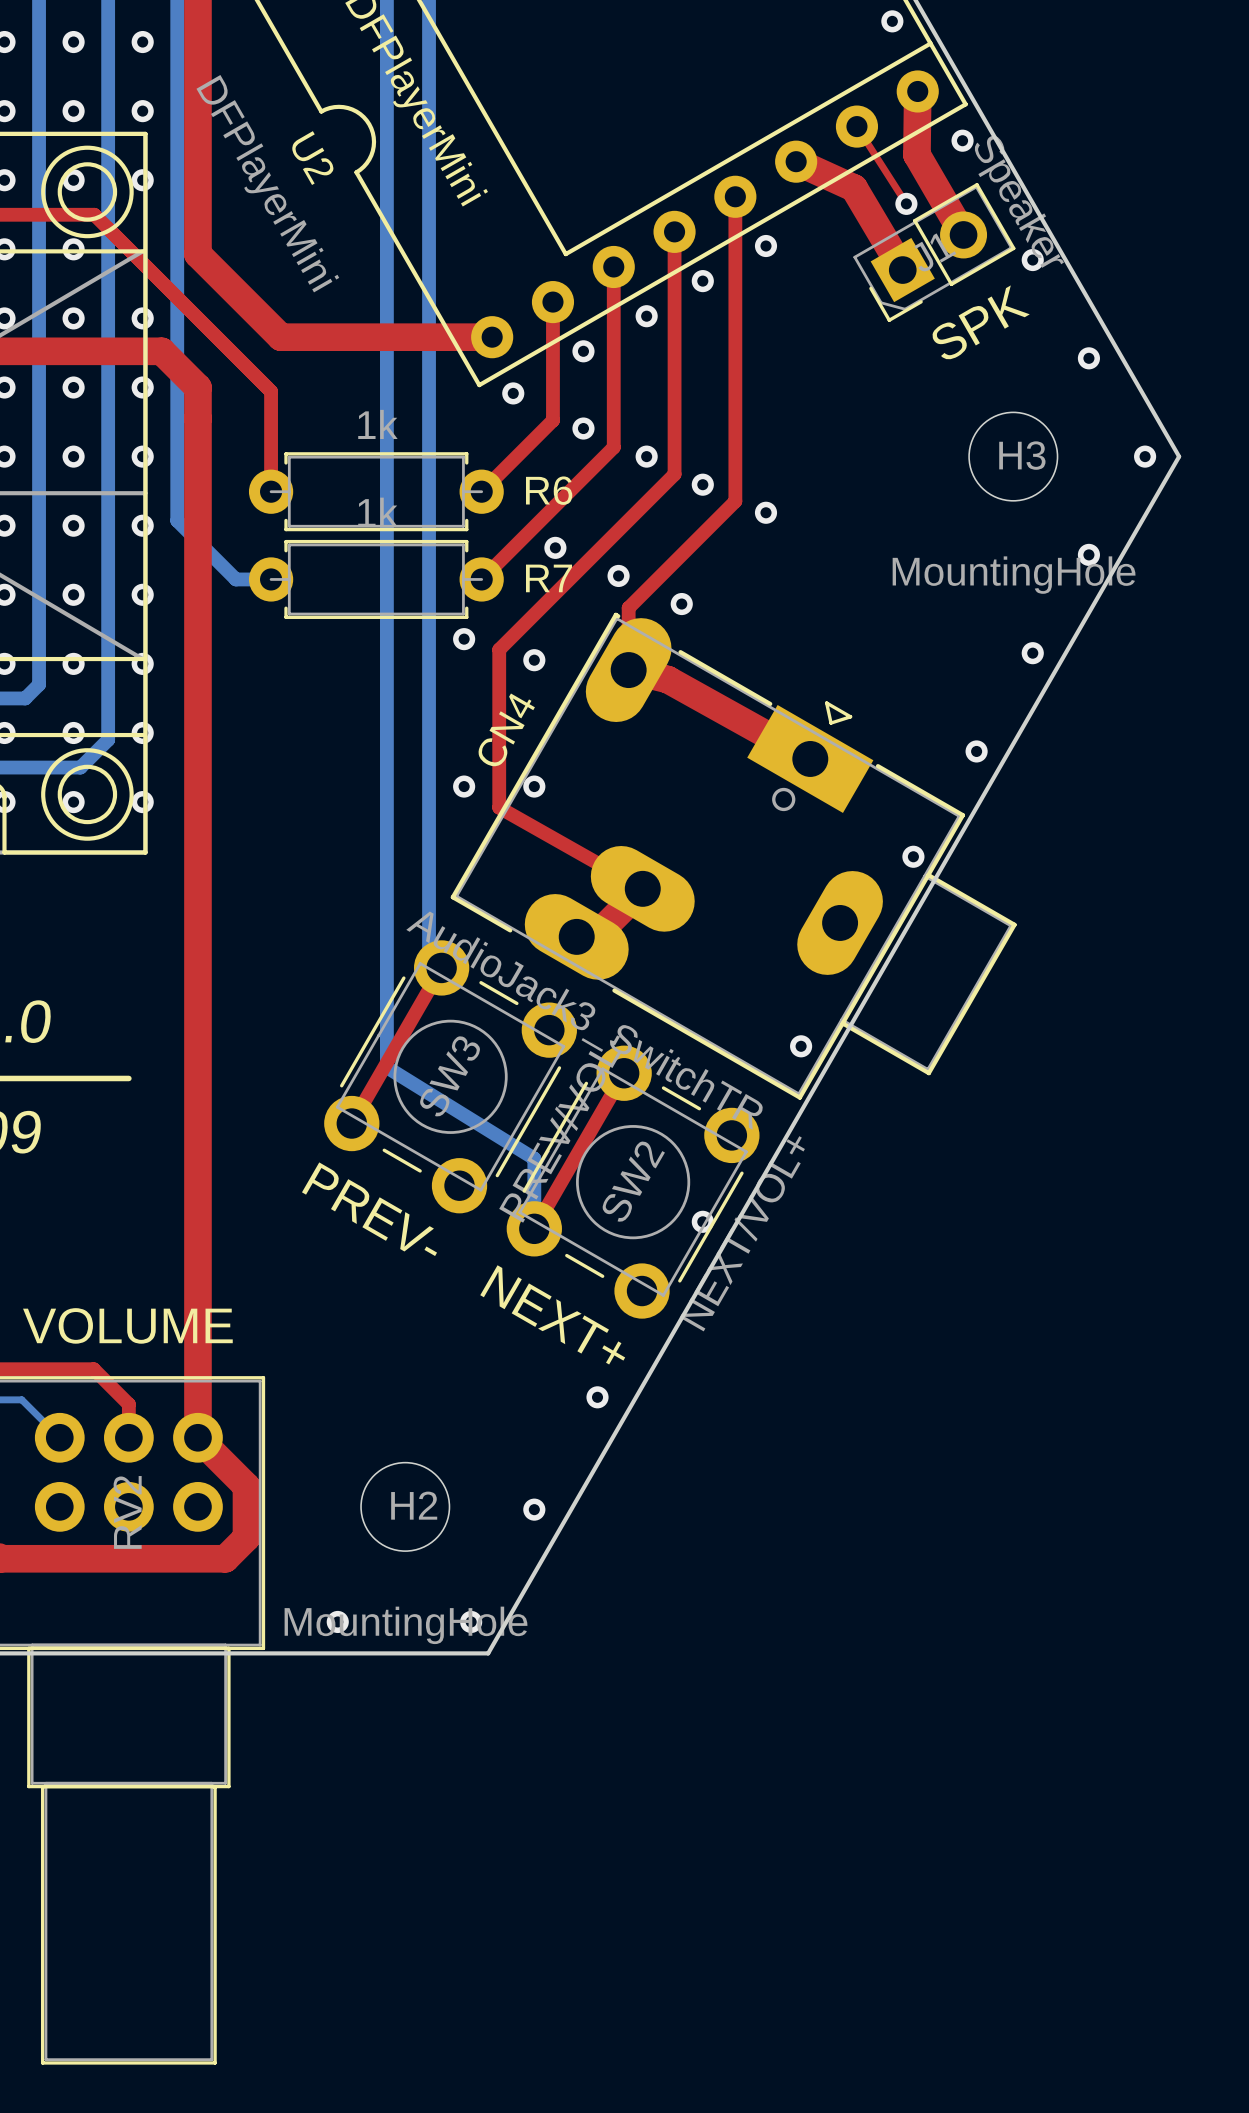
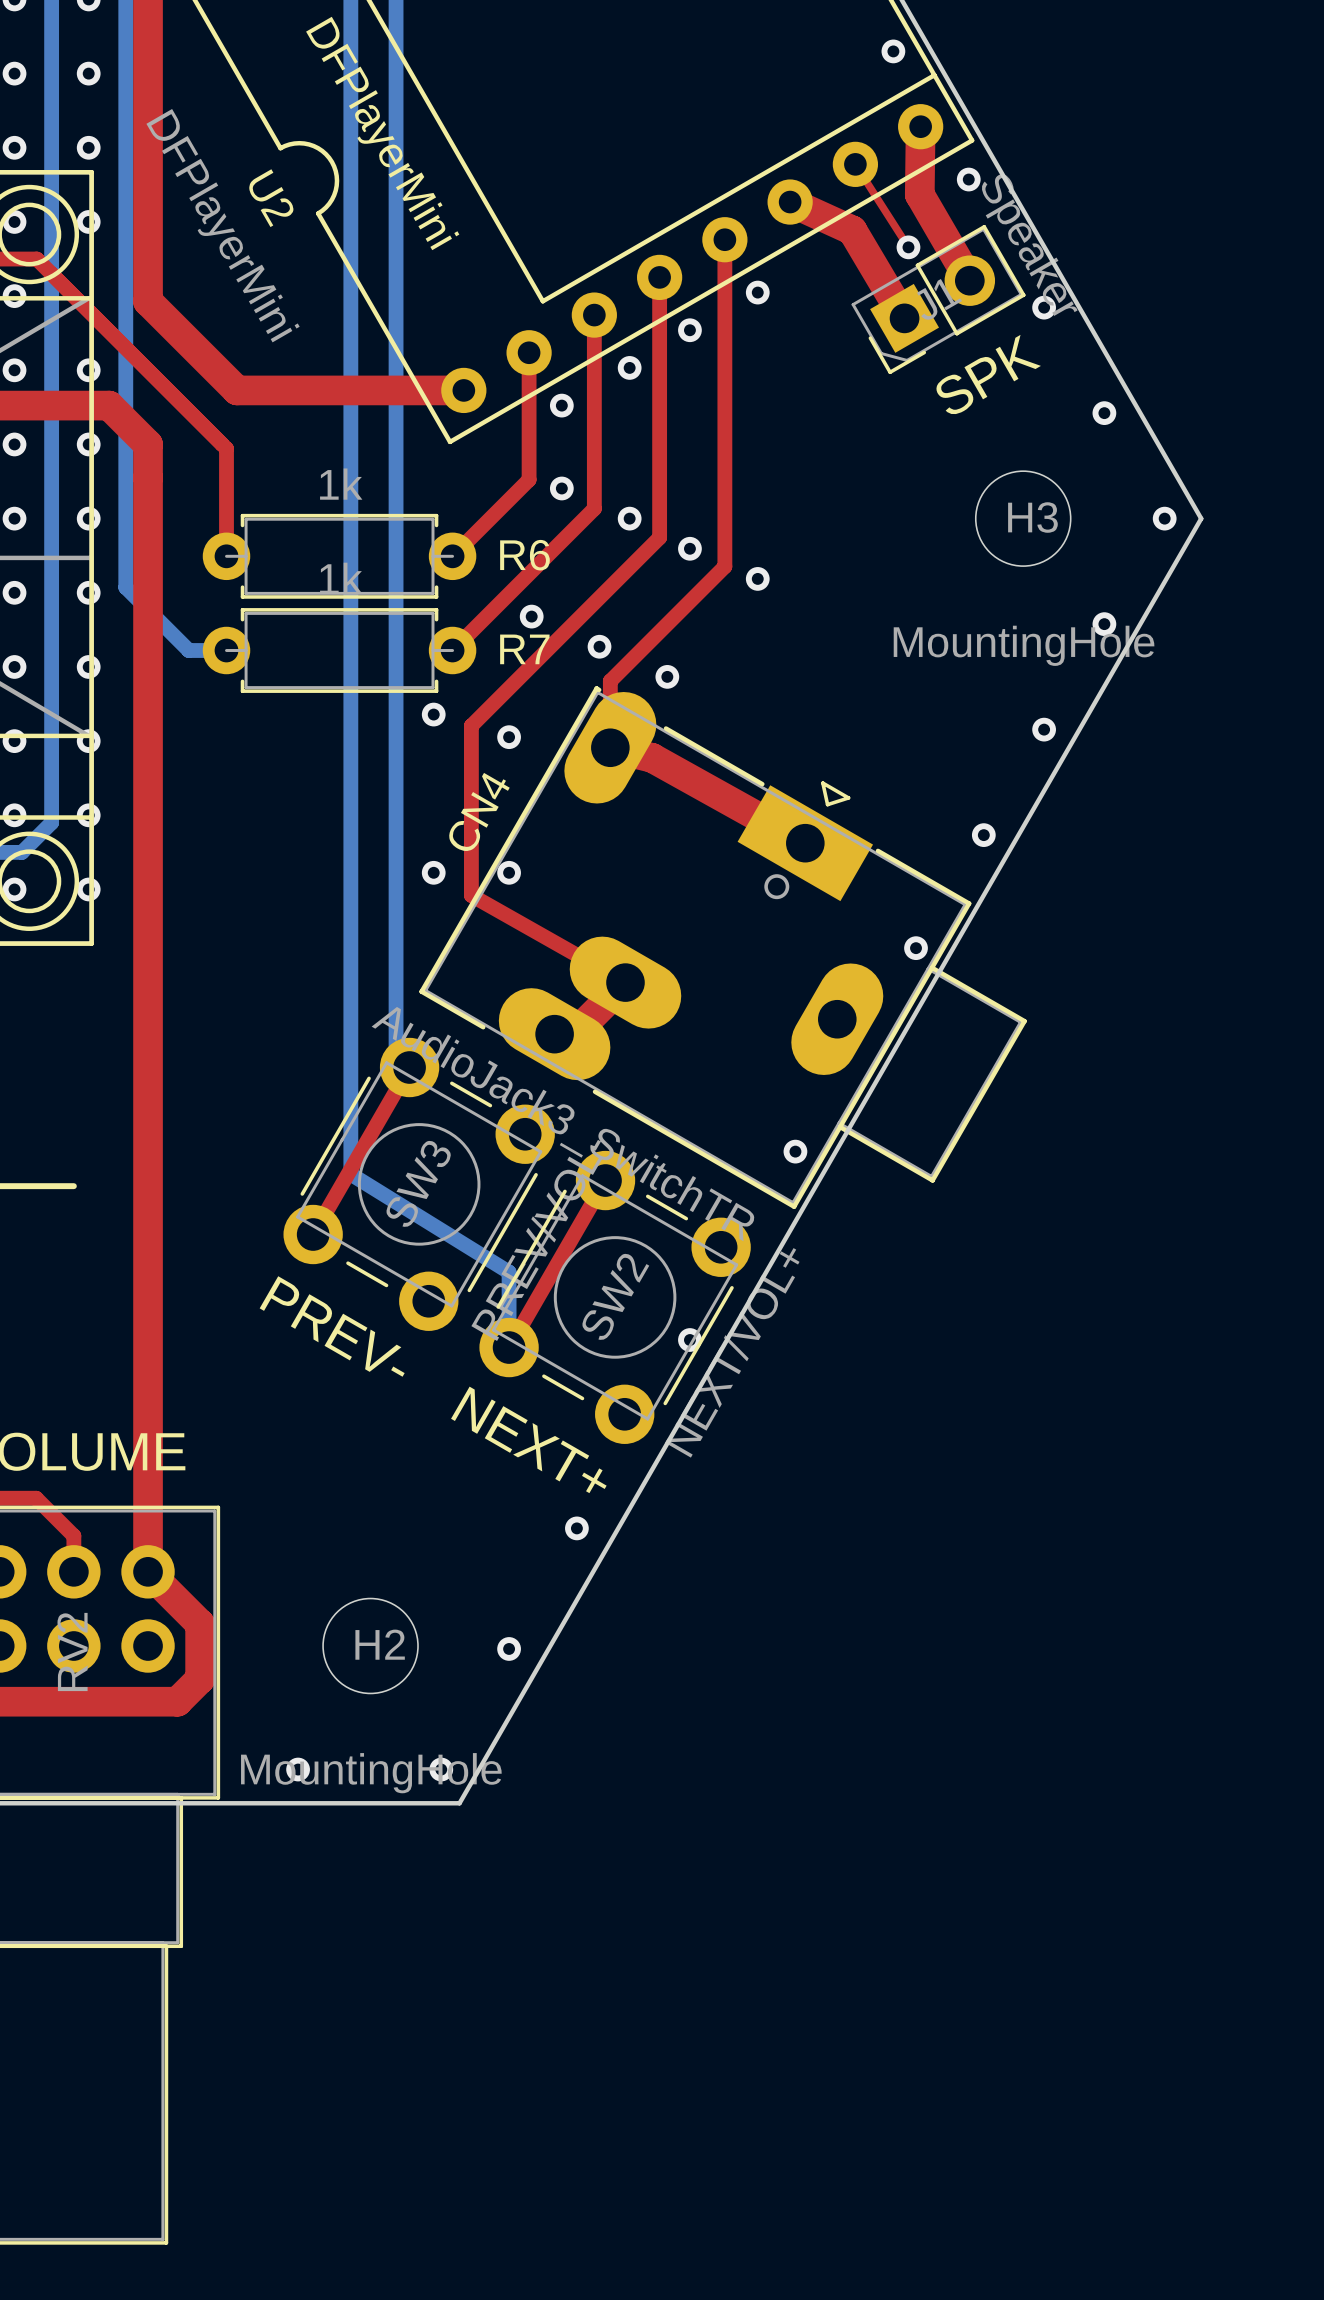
via: (513, 393) -> none

